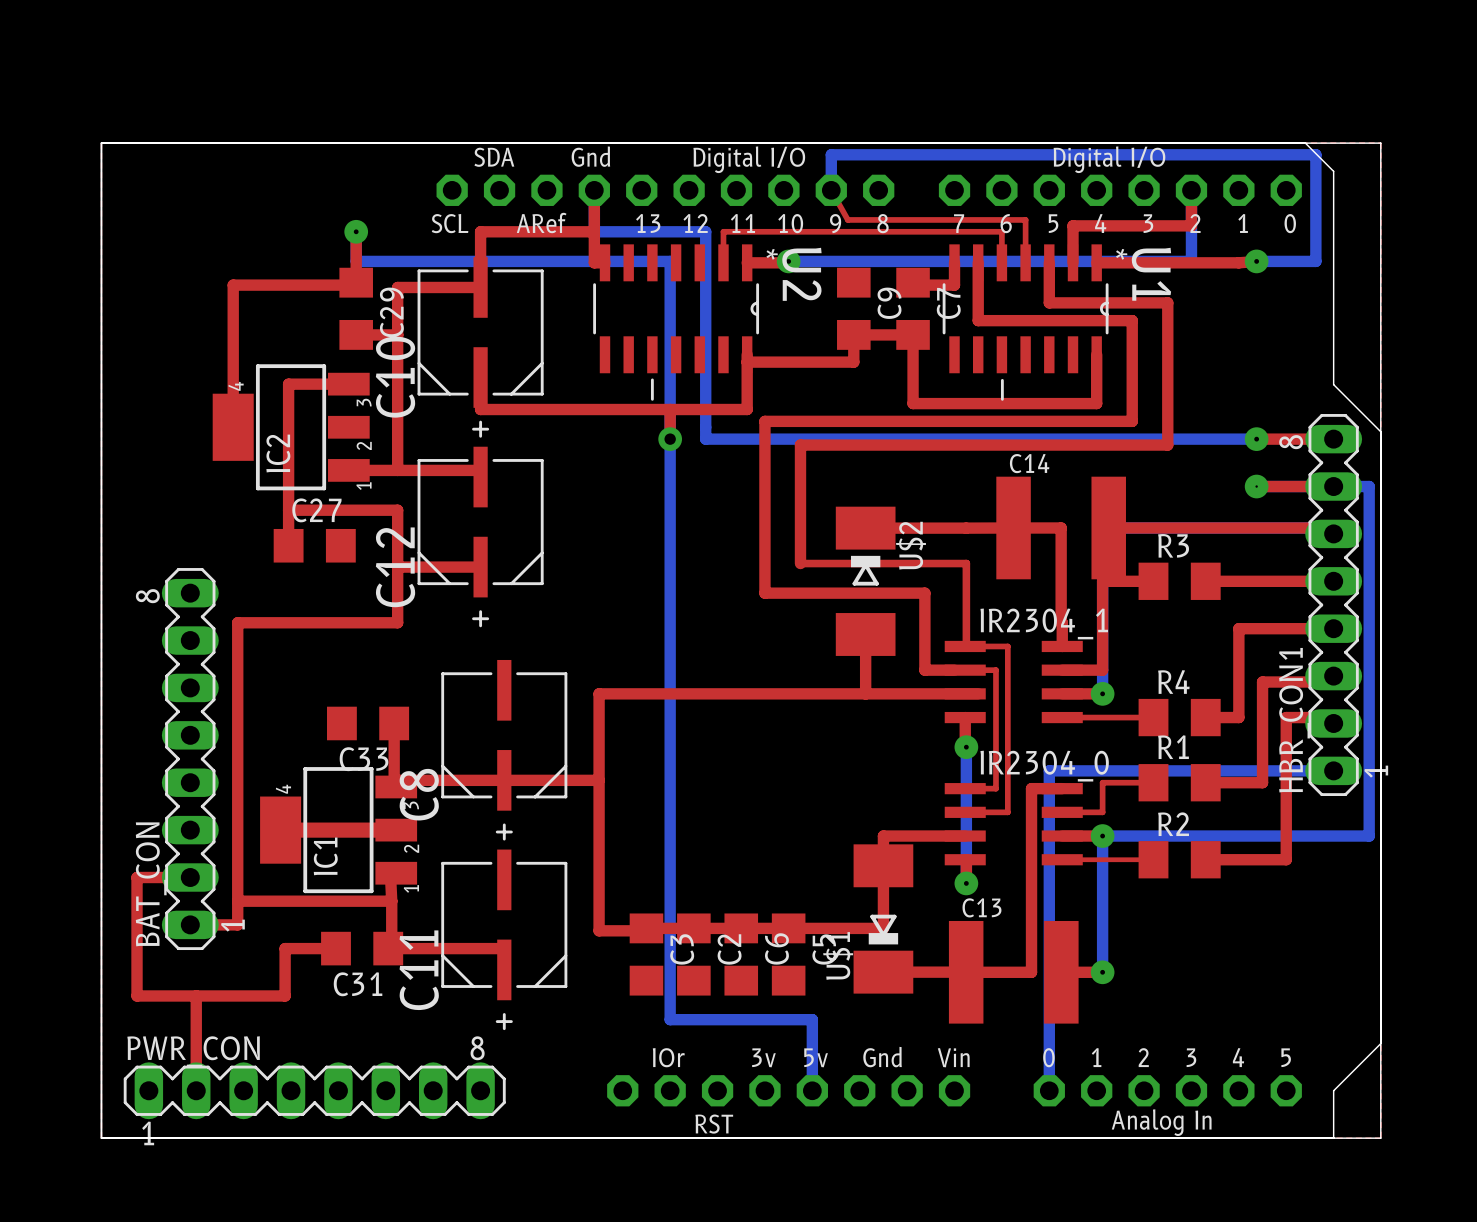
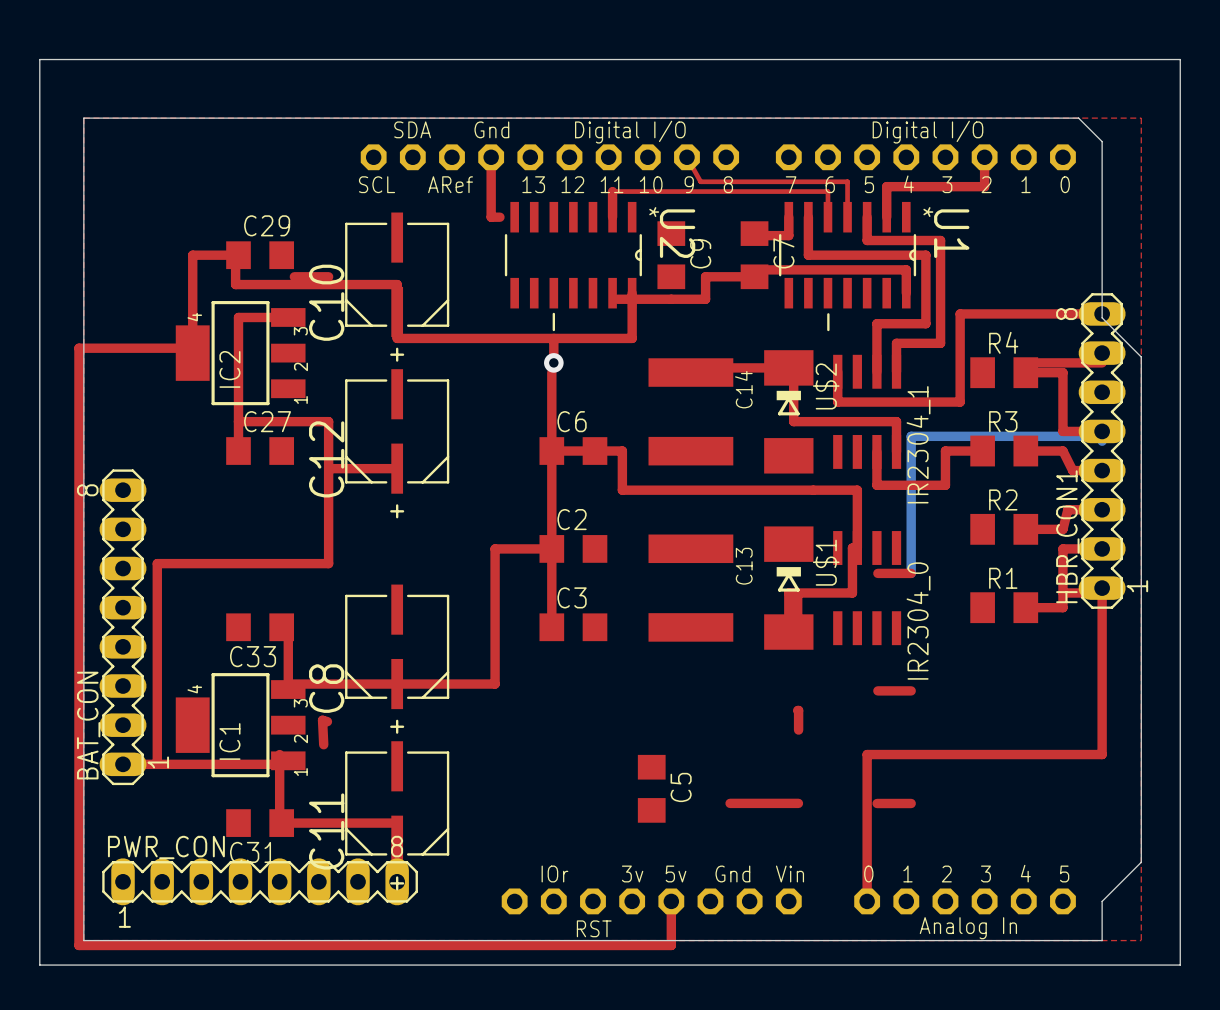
board edge: (101, 143) (1380, 143) (1380, 1138) (101, 1138) (101, 143) -> (39, 59) (39, 965) (1180, 965) (1180, 59) (39, 59)
bottom track: (594, 190) (594, 231) (705, 231) (705, 439) (1256, 439) -> none
bottom track: (831, 190) (831, 154) (1315, 154) (1315, 261) (1256, 261) -> none
bottom track: (1191, 190) (1191, 261) (788, 261) -> none
top track: (356, 231) (356, 285) (233, 285) (233, 308) -> (238, 255) (192, 255)
bottom track: (356, 231) (356, 261) (670, 261) (670, 1019) (812, 1019) (812, 1090) -> none
via: (356, 231) -> none
top track: (594, 231) (480, 231) (480, 287) (397, 287) (397, 470) -> none
top track: (741, 231) (723, 231) (723, 262) -> (612, 191) (612, 217)
top track: (788, 261) (747, 262) -> none
via: (788, 261) -> none
top track: (1256, 261) (1096, 262) -> none
via: (1256, 261) -> none
top track: (1049, 291) (1049, 302) (1167, 302) (1167, 445) (800, 445) (800, 563) (966, 563) (966, 646) -> (867, 240) (940, 240) (940, 343) (896, 343) (896, 371)
top track: none -> (235, 255) (235, 284) (397, 284) (397, 311)
C29 rotation: 0° (356, 308) -> 90° clockwise (260, 255)
C9 position: (853, 308) -> (671, 255)
top track: (978, 308) (978, 320) (1132, 320) (1132, 421) (764, 421) (764, 593) -> (808, 255) (925, 255) (925, 323) (876, 323) (876, 371)
C29 name position: C29 (391, 312) -> C29 (267, 225)
U2 position: (676, 322) -> (573, 266)
top track: (907, 334) (913, 334) (913, 403) (1096, 403) (1096, 354) -> (749, 276) (749, 269) (906, 269) (906, 293)
top track: (747, 354) (747, 409) -> (632, 293) (632, 338) (617, 338)
top track: none -> (1102, 313) (960, 313) (960, 402) (837, 402) (837, 371)
top track: none -> (192, 348) (78, 348) (78, 945) (671, 945) (671, 901)
via: (1256, 439) -> none
top track: none -> (551, 372) (551, 627)
top track: none -> (690, 372) (690, 367) (793, 367) (793, 421) (896, 421) (896, 451)
top track: none -> (1025, 372) (1062, 372) (1062, 431) (1102, 431)
top track: (348, 470) (480, 470) (480, 477) -> none
top track: (1256, 486) (1333, 486) -> none
bottom track: (1256, 486) (1369, 486) (1369, 836) (1102, 836) (1102, 972) -> none
via: (1256, 486) -> none
C14 rotation: 0° (1061, 527) -> 90° clockwise (690, 411)
C14 position: (1061, 527) -> (690, 411)
top track: (1108, 527) (1333, 527) (1333, 533) -> none
top track: (865, 528) (1061, 527) (1061, 546) -> none
top track: none -> (551, 451) (622, 451) (622, 490) (632, 490)
top track: none -> (1025, 451) (1062, 451) (1072, 470) (1102, 470)
U$2 position: (865, 581) -> (788, 411)
top track: (1153, 581) (1102, 581) (1102, 670) (1062, 670) -> none
R3 position: (1179, 581) -> (1004, 451)
top track: (1205, 581) (1333, 581) -> none
top track: (1061, 587) (1062, 646) -> (876, 485) (945, 485) (945, 451) (982, 451)
top track: (924, 593) (924, 670) (954, 670) -> (764, 490) (857, 490) (857, 548) (852, 548) (852, 592) (788, 592) (788, 632)
HBR_CON1 position: (1333, 605) -> (1102, 451)
top track: none -> (1102, 509) (1067, 509) (1062, 529) (1025, 529)
top track: (397, 622) (237, 622) (237, 924) -> (328, 514) (328, 563) (157, 563) (157, 764) (123, 764)
top track: (1333, 628) (1238, 628) (1238, 717) (1205, 717) -> none
top track: (865, 634) (865, 693) -> none
top track: (966, 646) (1007, 646) (1007, 812) (965, 812) -> none
top track: none -> (1102, 548) (1062, 548) (1062, 592)
top track: (965, 670) (995, 670) (995, 788) (965, 788) -> none
top track: (1333, 676) (1333, 682) (1262, 682) (1262, 782) (1205, 782) -> none
IR2304_1 rotation: 0° (1013, 682) -> 90° clockwise (867, 411)
IR2304_1 position: (1013, 682) -> (867, 411)
top track: (599, 693) (978, 693) -> (495, 573) (495, 548) (551, 548)
via: (1102, 693) -> none
top track: (1062, 717) (1153, 717) -> none
R4 position: (1179, 717) -> (1004, 372)
C33 position: (368, 723) -> (260, 627)
top track: (394, 723) (394, 786) (396, 786) -> none
top track: none -> (1102, 597) (1102, 754) (867, 754) (867, 901)
top track: (1286, 735) (1286, 859) (1205, 859) -> (1062, 607) (1025, 607)
bottom track: (966, 747) (966, 883) -> none
via: (966, 747) -> none
C8 position: (504, 750) -> (397, 659)
BAT_CON position: (190, 759) -> (123, 627)
top track: none -> (281, 627) (288, 627) (288, 689)
bottom track: (1333, 770) (1049, 770) (1049, 1090) -> none
top track: (394, 780) (599, 780) -> none
top track: (1153, 782) (1102, 782) (1102, 812) (1062, 812) -> none
R1 position: (1179, 782) -> (1004, 607)
top track: (1062, 788) (1031, 788) (1031, 972) (966, 972) -> none
IR2304_0 rotation: 0° (1013, 824) -> 90° clockwise (867, 588)
IR2304_0 position: (1013, 824) -> (867, 588)
top track: (599, 827) (599, 930) (646, 930) (646, 928) (883, 928) (883, 836) (965, 836) -> (495, 684) (288, 684)
top track: (280, 830) (396, 830) -> none
IC1 position: (338, 830) -> (240, 725)
via: (1102, 836) -> none
top track: (1062, 859) (1153, 859) -> none
R2 position: (1179, 859) -> (1004, 529)
top track: (190, 877) (137, 877) (137, 995) (285, 995) (285, 948) (336, 948) -> none
via: (966, 883) -> none
top track: (237, 901) (391, 901) (391, 948) -> none
top track: none -> (279, 754) (279, 823) (397, 823) (397, 840)
U$1 rotation: 0° (883, 918) -> 180° (788, 588)
U$1 position: (883, 918) -> (788, 588)
top track: none -> (288, 760) (288, 764) (196, 764)
C11 position: (504, 939) -> (397, 815)
C31 position: (362, 948) -> (260, 823)
top track: (388, 948) (504, 948) (504, 969) -> none
C6 name position: C6 (776, 948) -> C6 (572, 421)
C3 name position: C3 (682, 949) -> C3 (572, 597)
C2 name position: C2 (729, 949) -> C2 (572, 519)
C3 rotation: 0° (646, 954) -> 90° clockwise (573, 627)
C3 position: (646, 954) -> (573, 627)
C2 rotation: 0° (693, 954) -> 90° clockwise (573, 548)
C2 position: (693, 954) -> (573, 548)
C6 rotation: 0° (741, 954) -> 90° clockwise (573, 451)
C6 position: (741, 954) -> (573, 451)
C13 rotation: 0° (1013, 972) -> 90° clockwise (690, 588)
C13 position: (1013, 972) -> (690, 588)
via: (1102, 972) -> none
top track: (196, 995) (196, 1090) -> none
PWR_CON position: (314, 1090) -> (260, 881)

